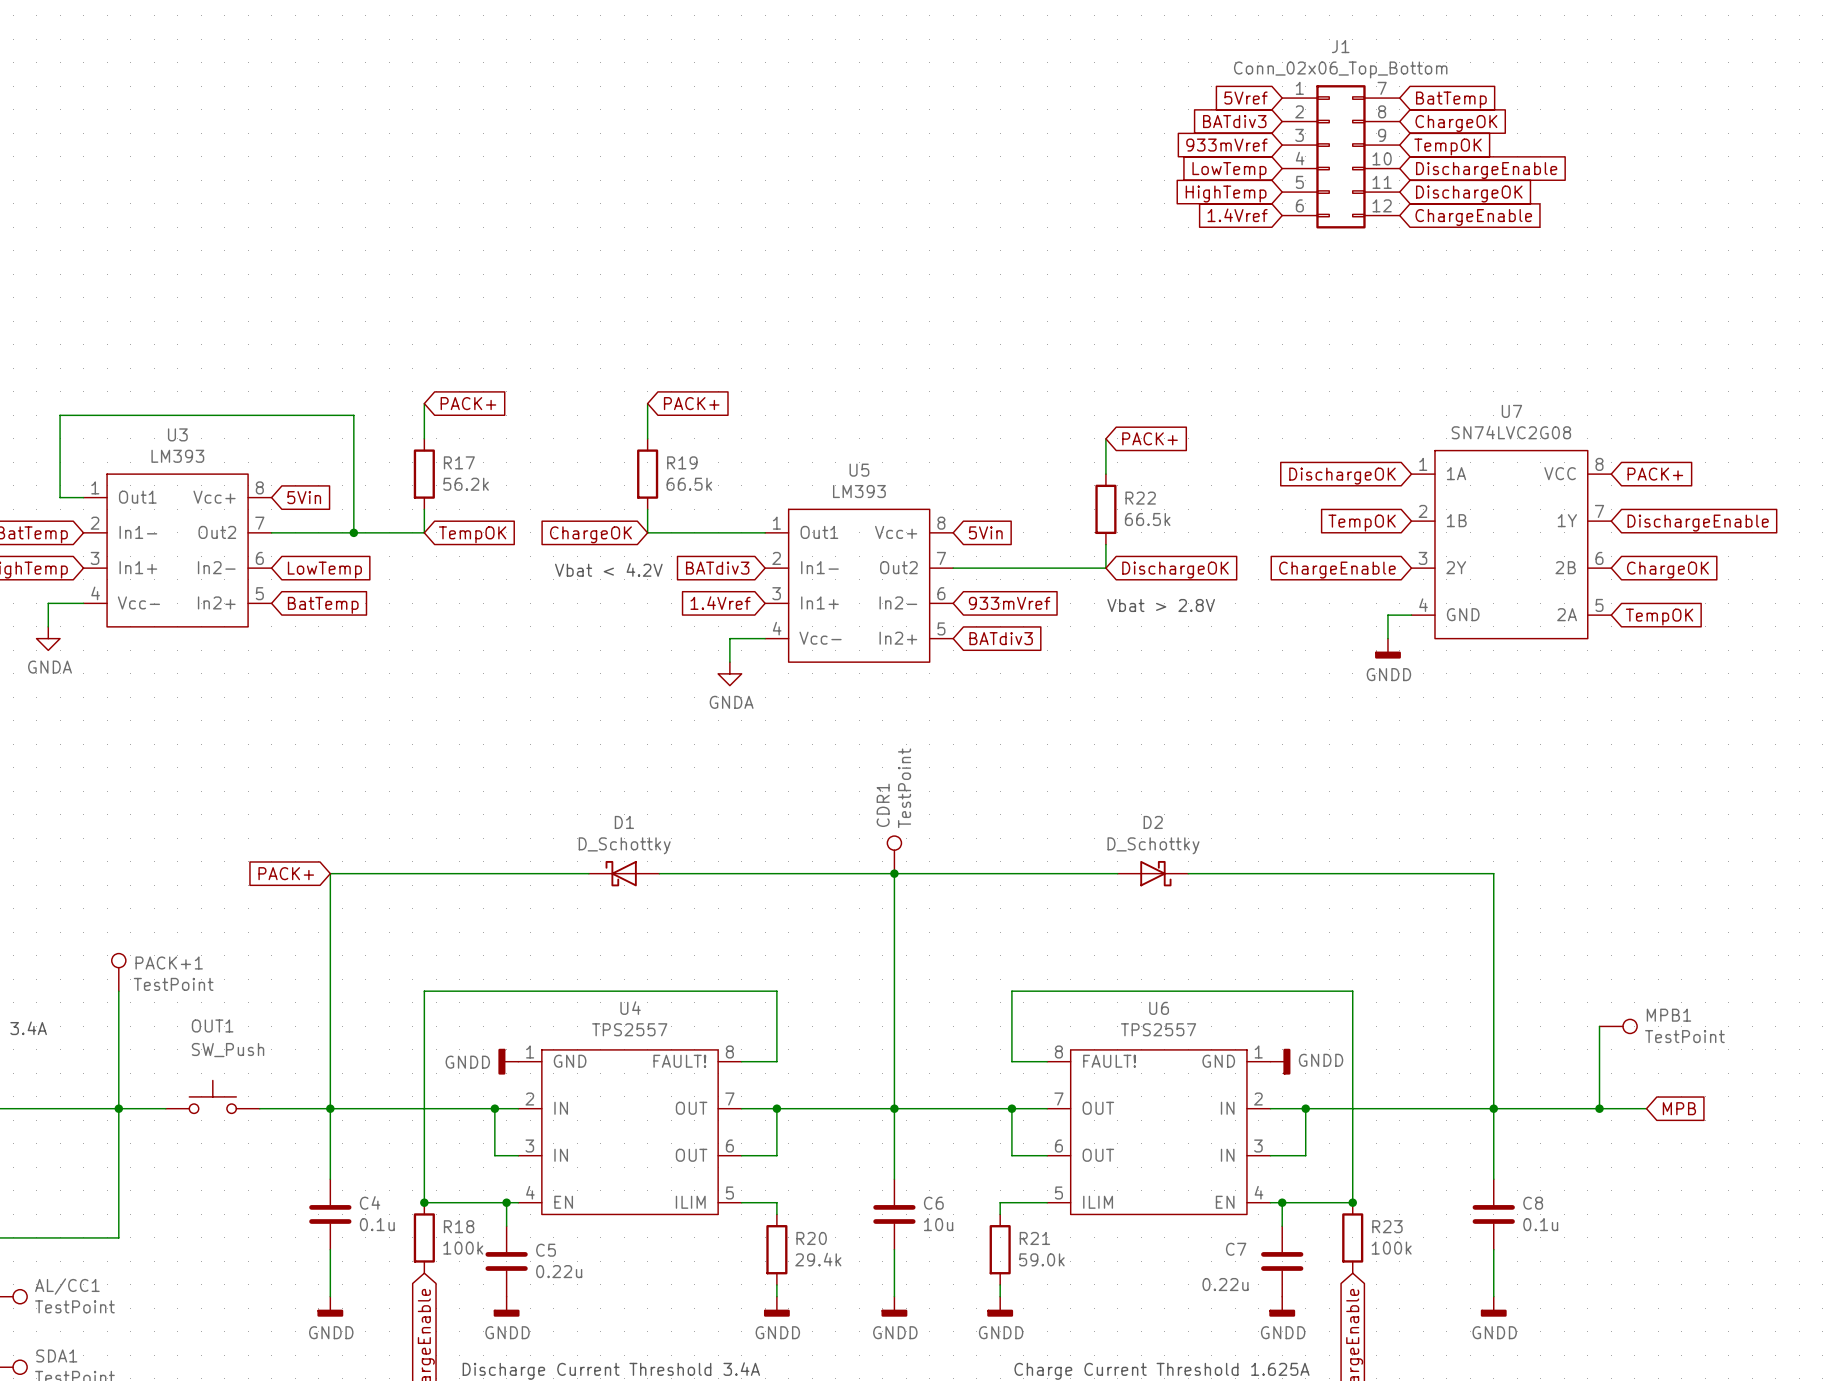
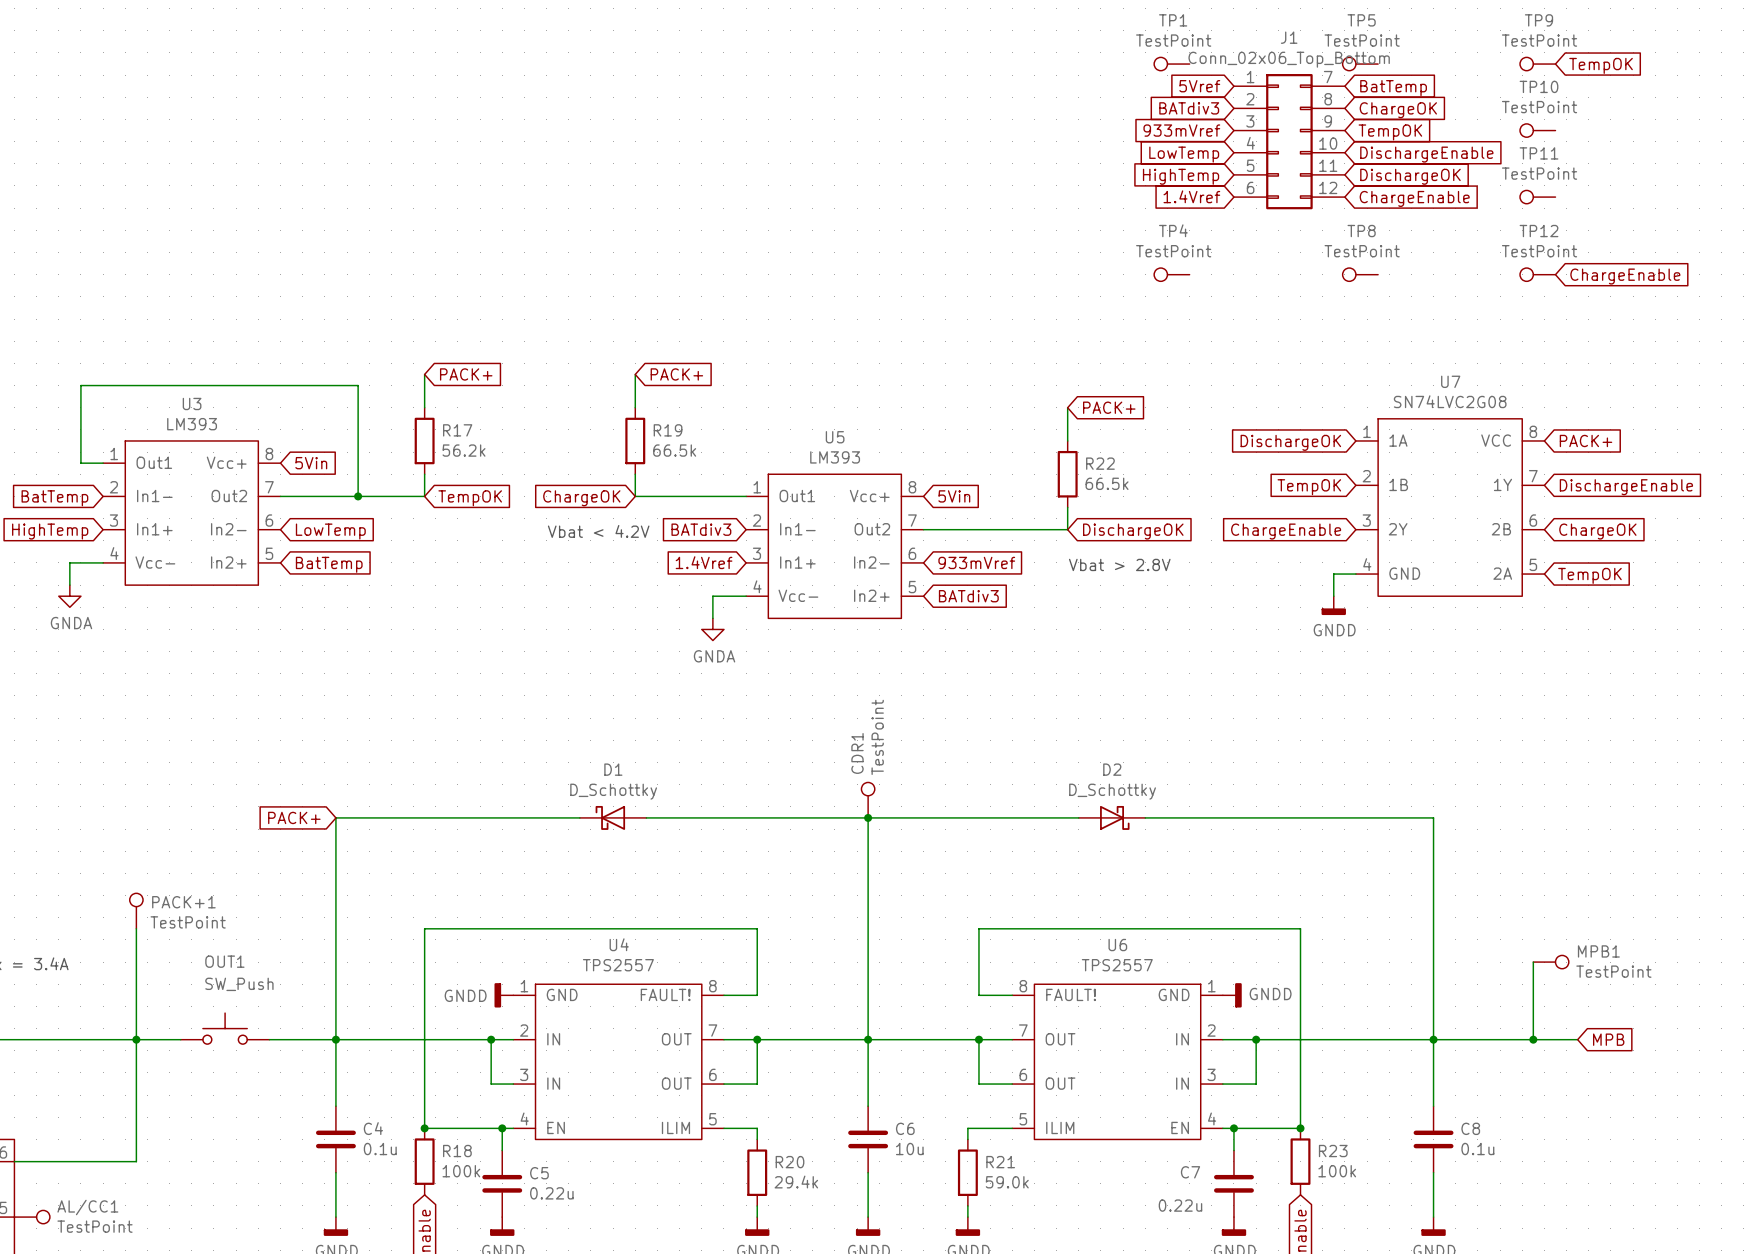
TP1: none -> TestPoint (1171, 64)
TP5: none -> TestPoint (1360, 64)
TP9: none -> TestPoint (1537, 64)
global label: none -> TempOK (1601, 65)
TP10: none -> TestPoint (1537, 130)
TP11: none -> TestPoint (1537, 197)
TP4: none -> TestPoint (1171, 274)
TP8: none -> TestPoint (1360, 274)
TP12: none -> TestPoint (1537, 274)
global label: none -> ChargeEnable (1625, 276)

